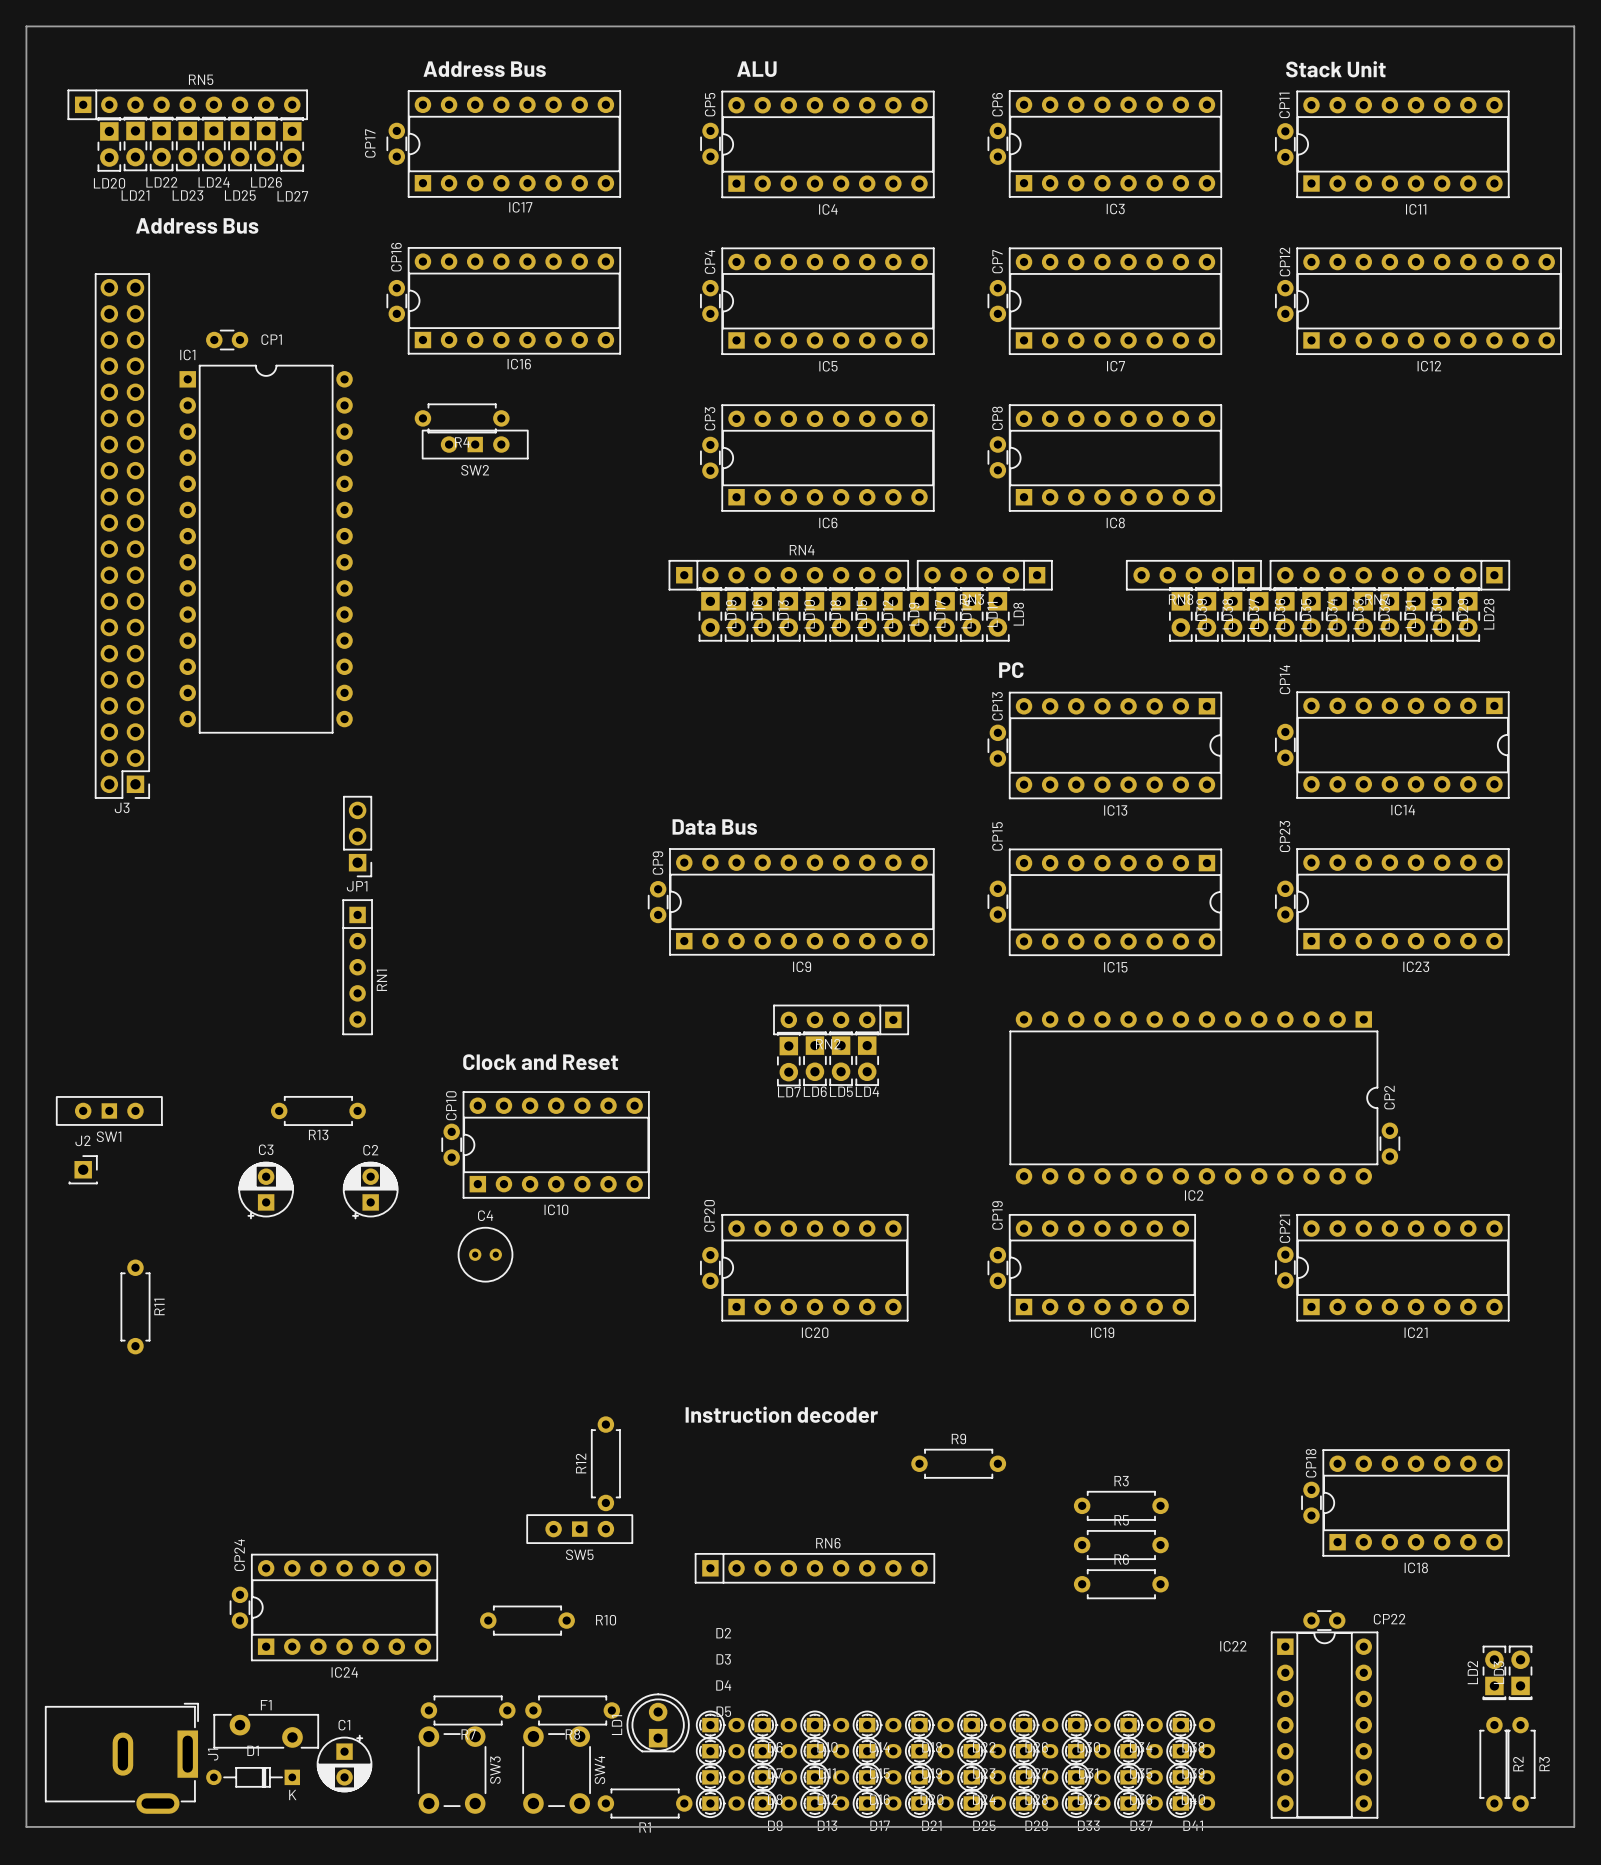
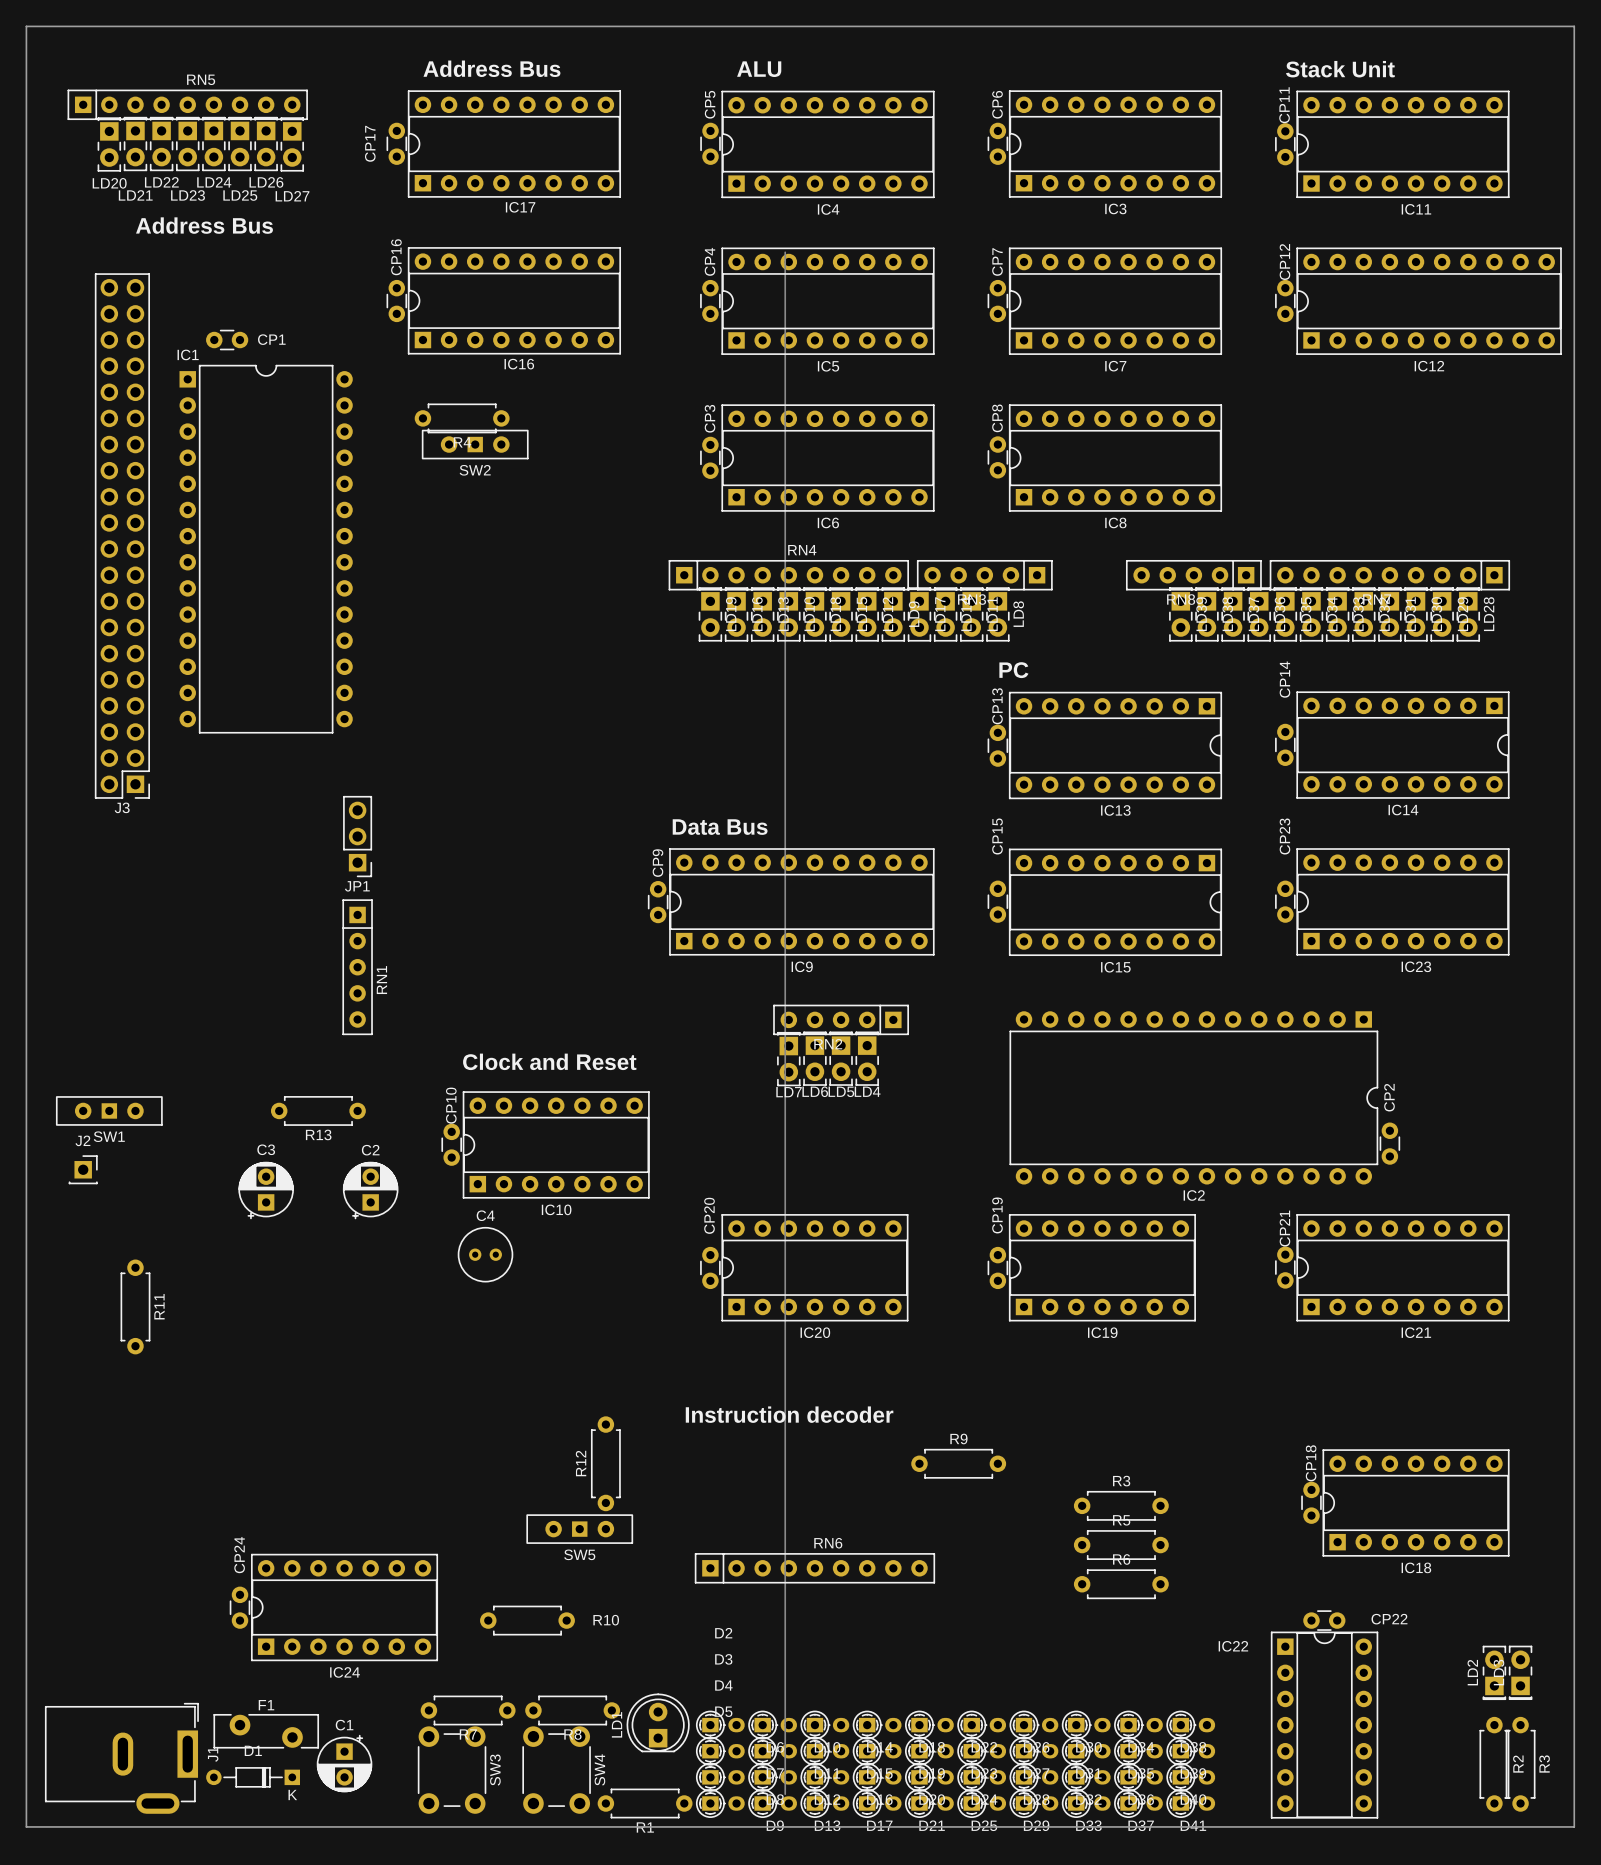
line: none -> (785, 252) (785, 1794)

